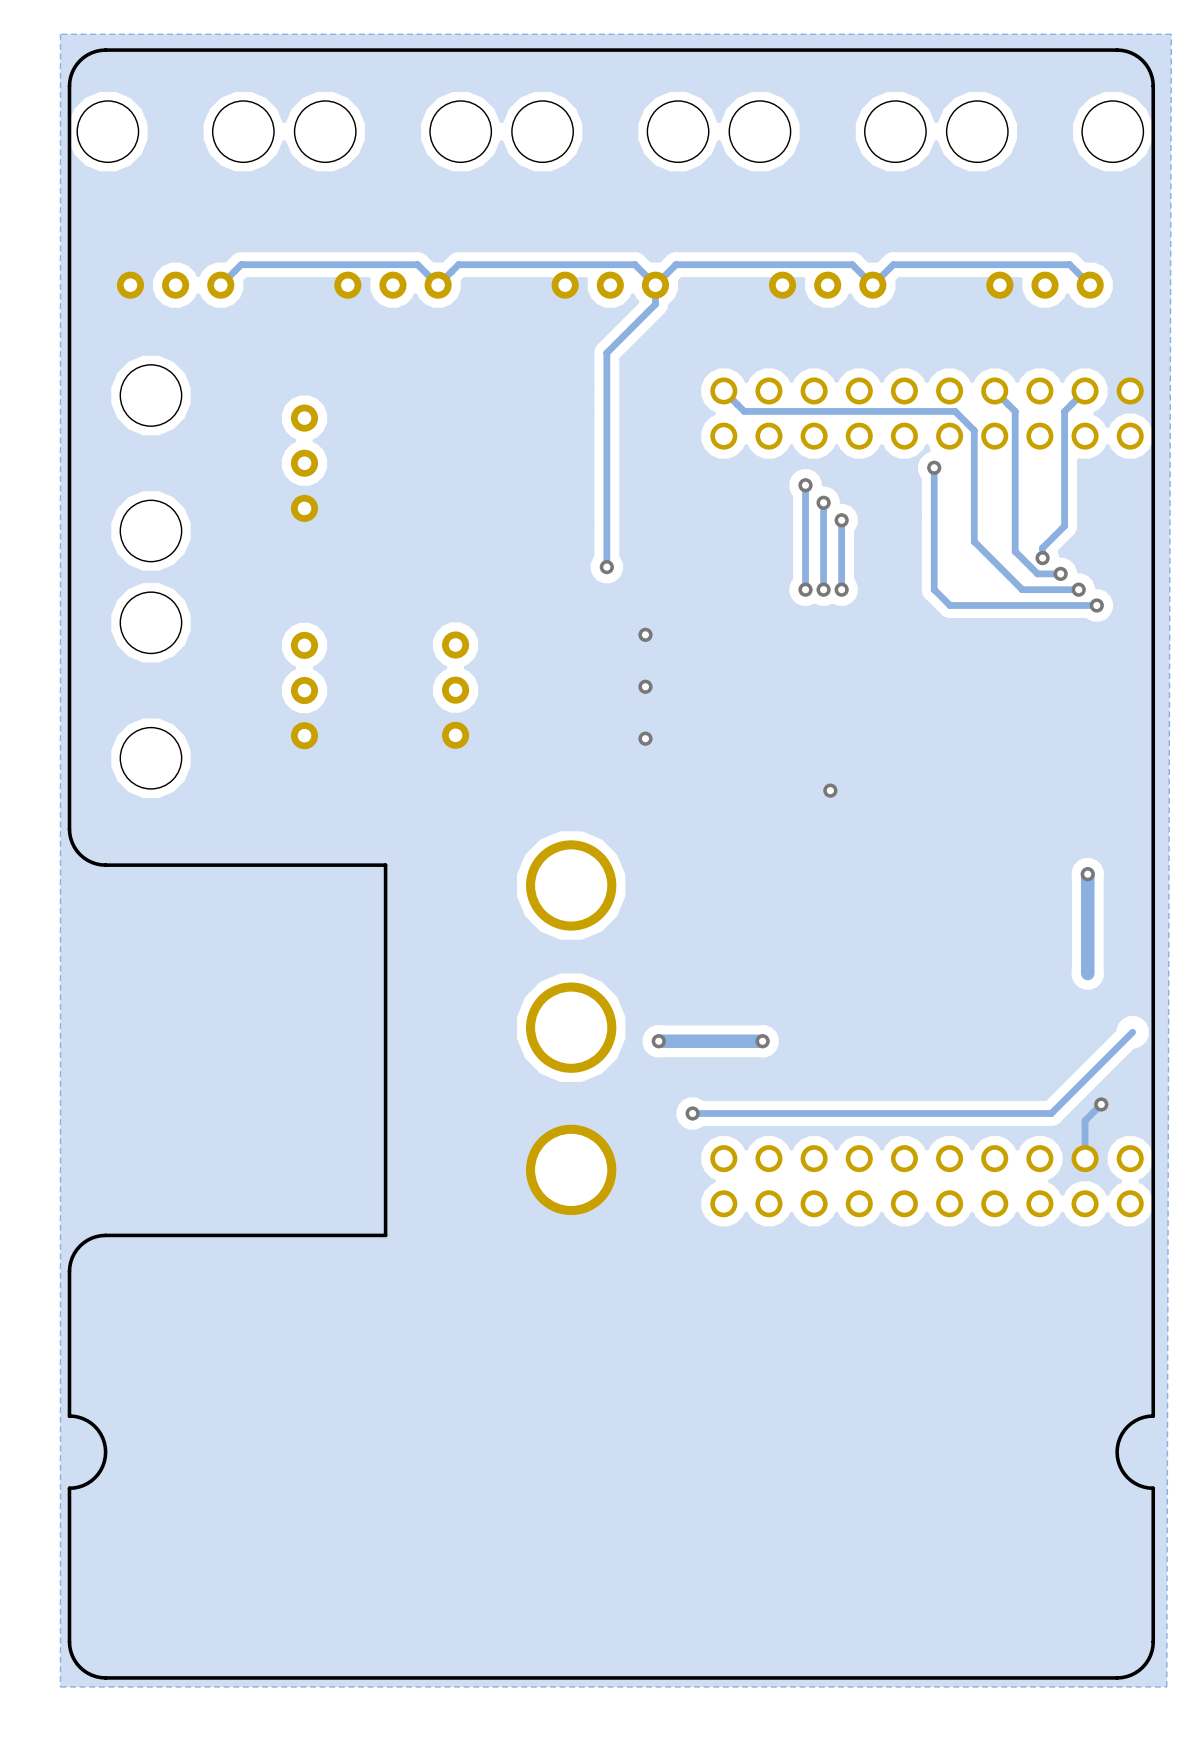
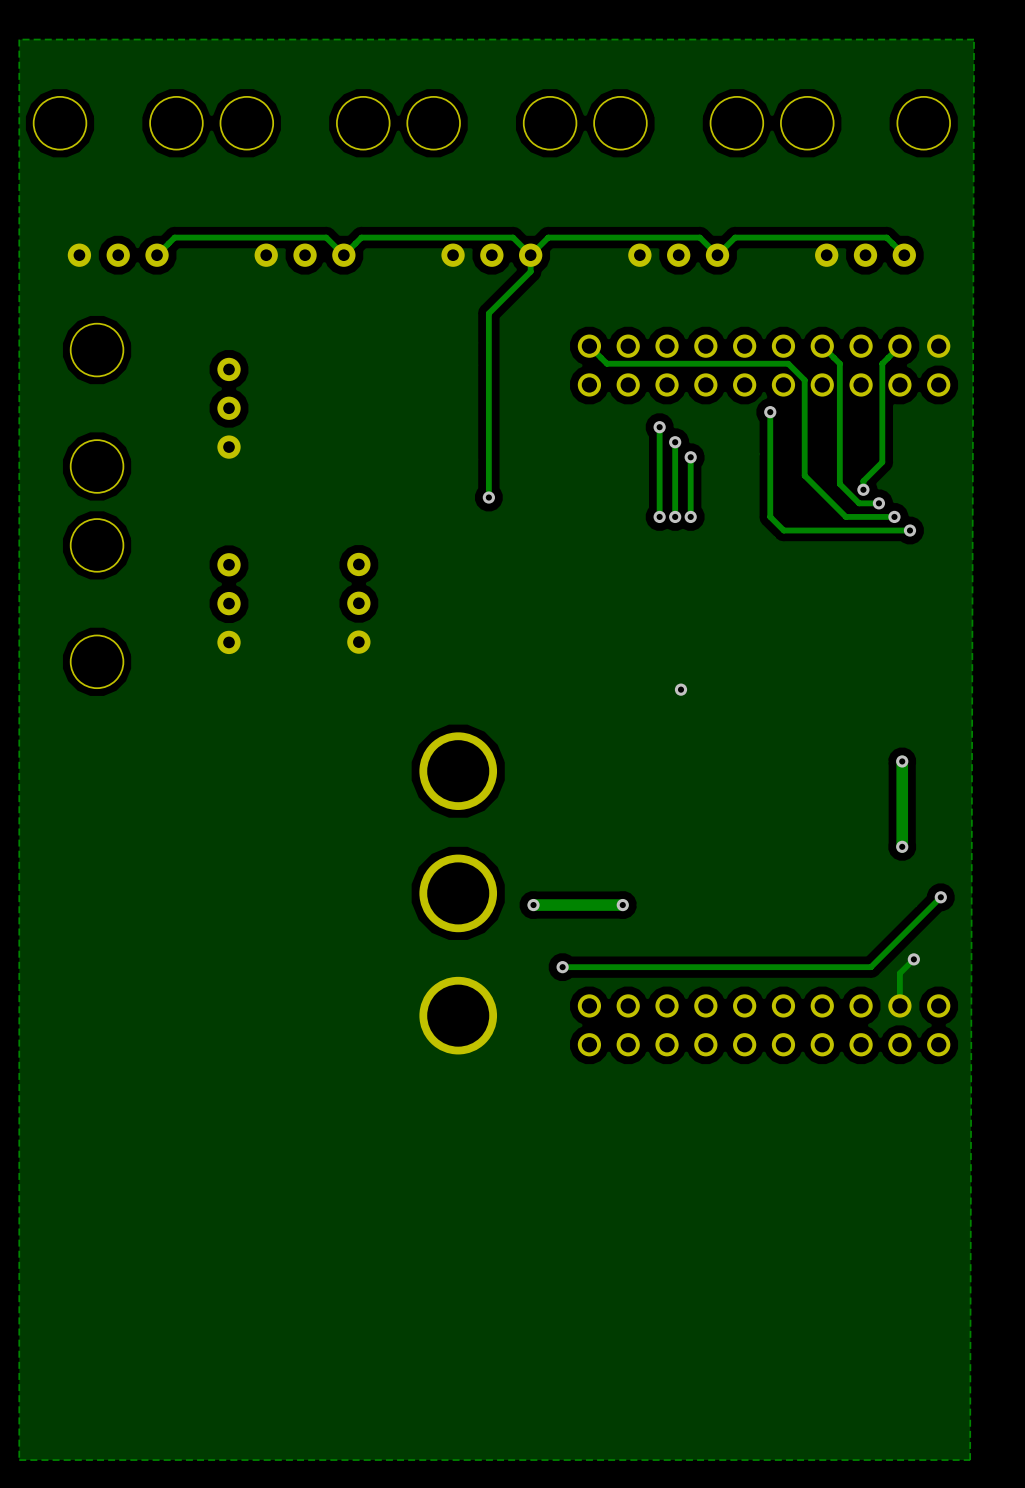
board edge: (1117, 50) (105, 50) (87, 54) (74, 68) (69, 86) (69, 829) (72, 842) (83, 857) (100, 864) (385, 865) (385, 1235) (100, 1235) (83, 1242) (72, 1257) (69, 1271) (69, 1416) (83, 1418) (95, 1426) (102, 1438) (105, 1452) (102, 1465) (95, 1477) (83, 1485) (69, 1488) (69, 1646) (74, 1659) (87, 1673) (105, 1677) (1117, 1677) (1135, 1673) (1148, 1659) (1153, 1641) (1153, 1488) (1139, 1485) (1127, 1477) (1119, 1465) (1117, 1452) (1119, 1438) (1127, 1426) (1139, 1418) (1153, 1416) (1153, 86) (1150, 72) (1142, 60) (1130, 52) (1117, 50) -> none
via: (645, 634) -> none
via: (645, 686) -> none
via: (645, 738) -> none
via: none -> (902, 846)
via: none -> (940, 897)

